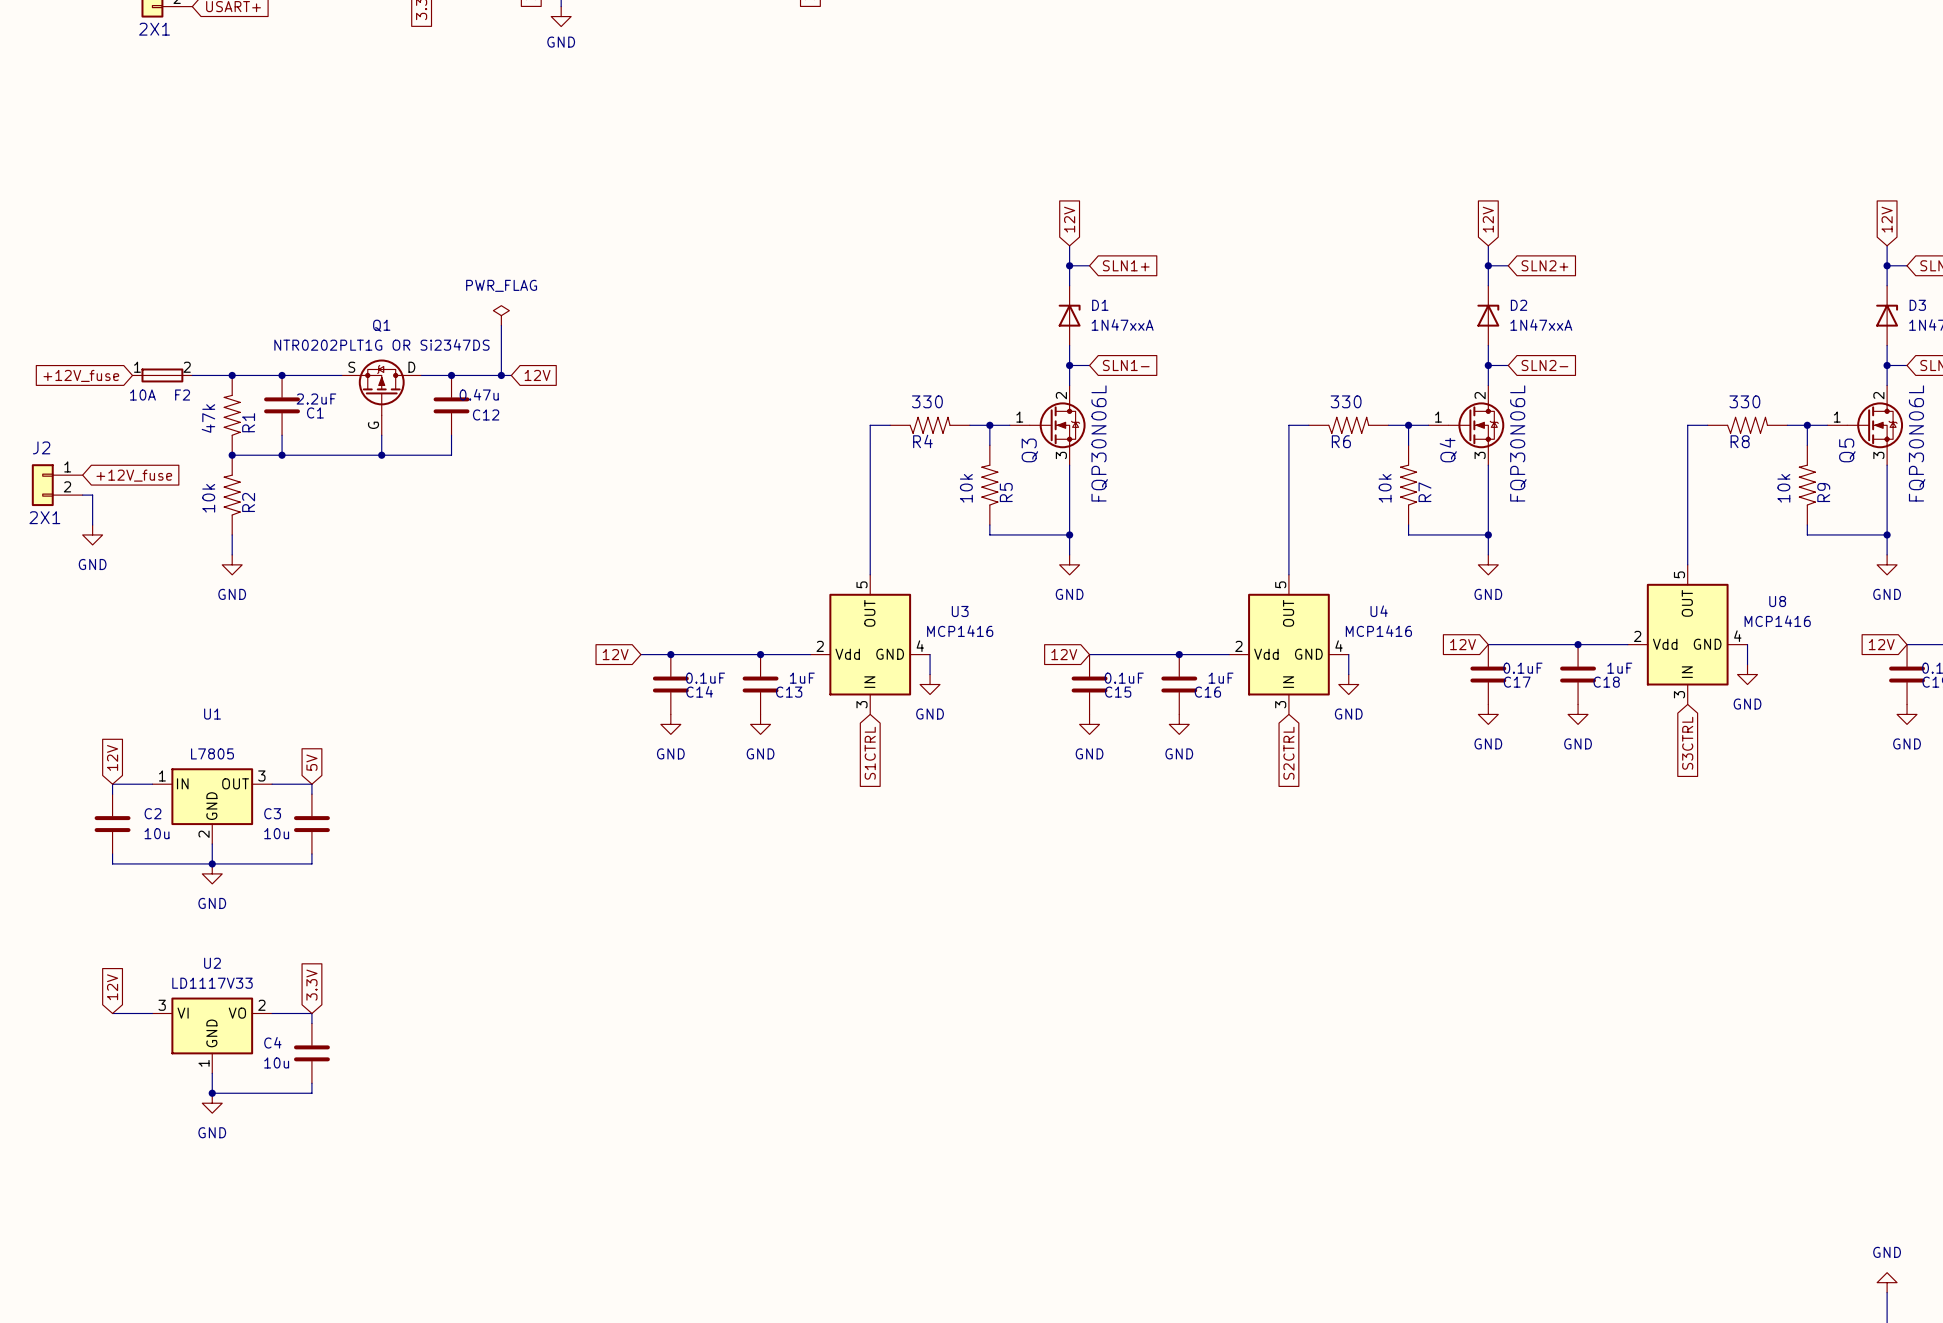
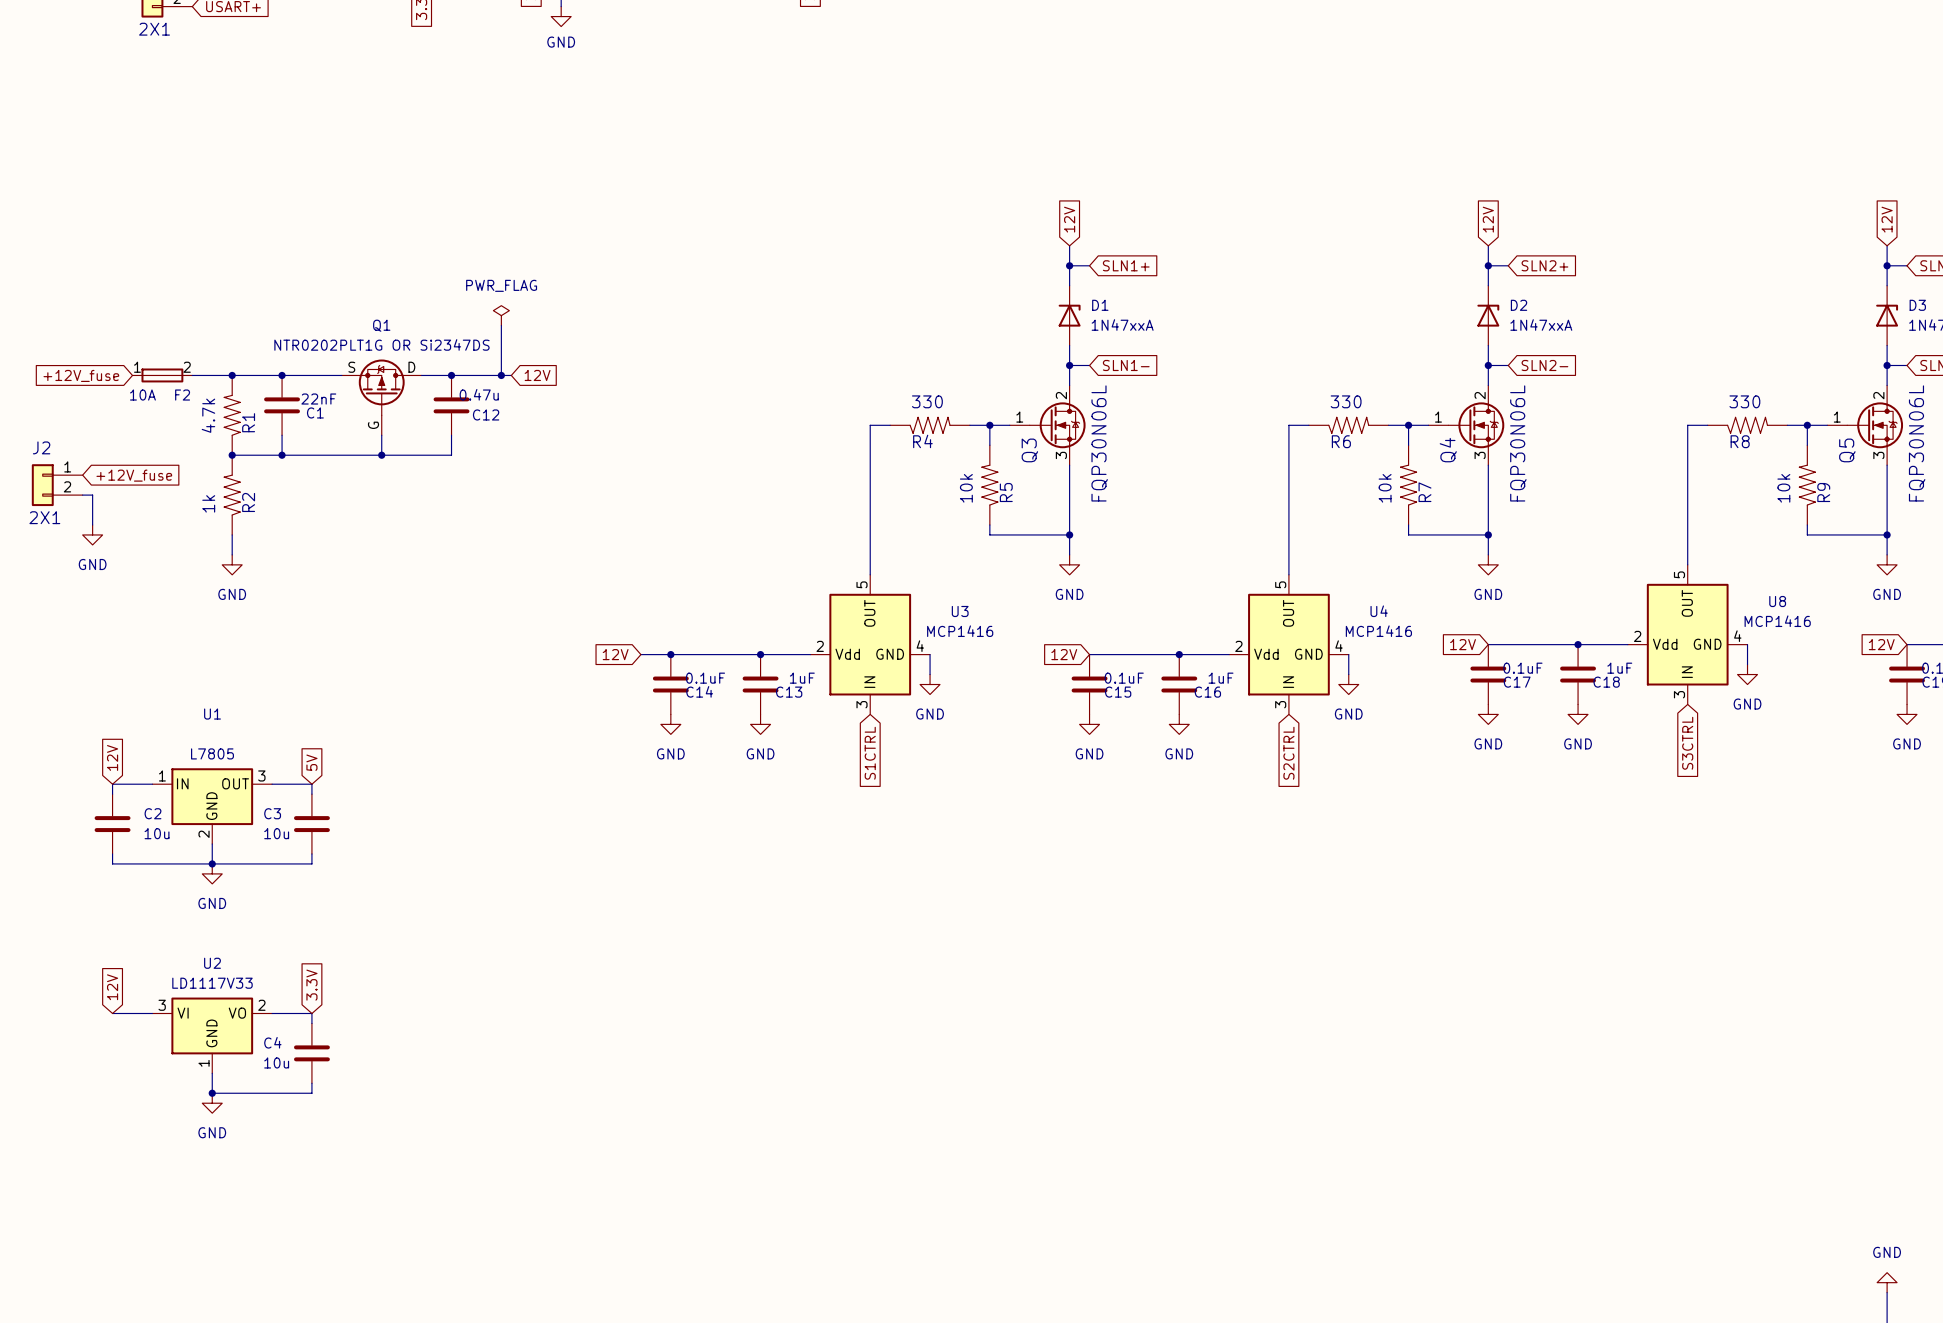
C1 value: 2.2uF (316, 399) -> 22nF (318, 399)
R1 value: 47k (208, 418) -> 4.7k (208, 415)
R2 value: 10k (208, 498) -> 1k (208, 503)

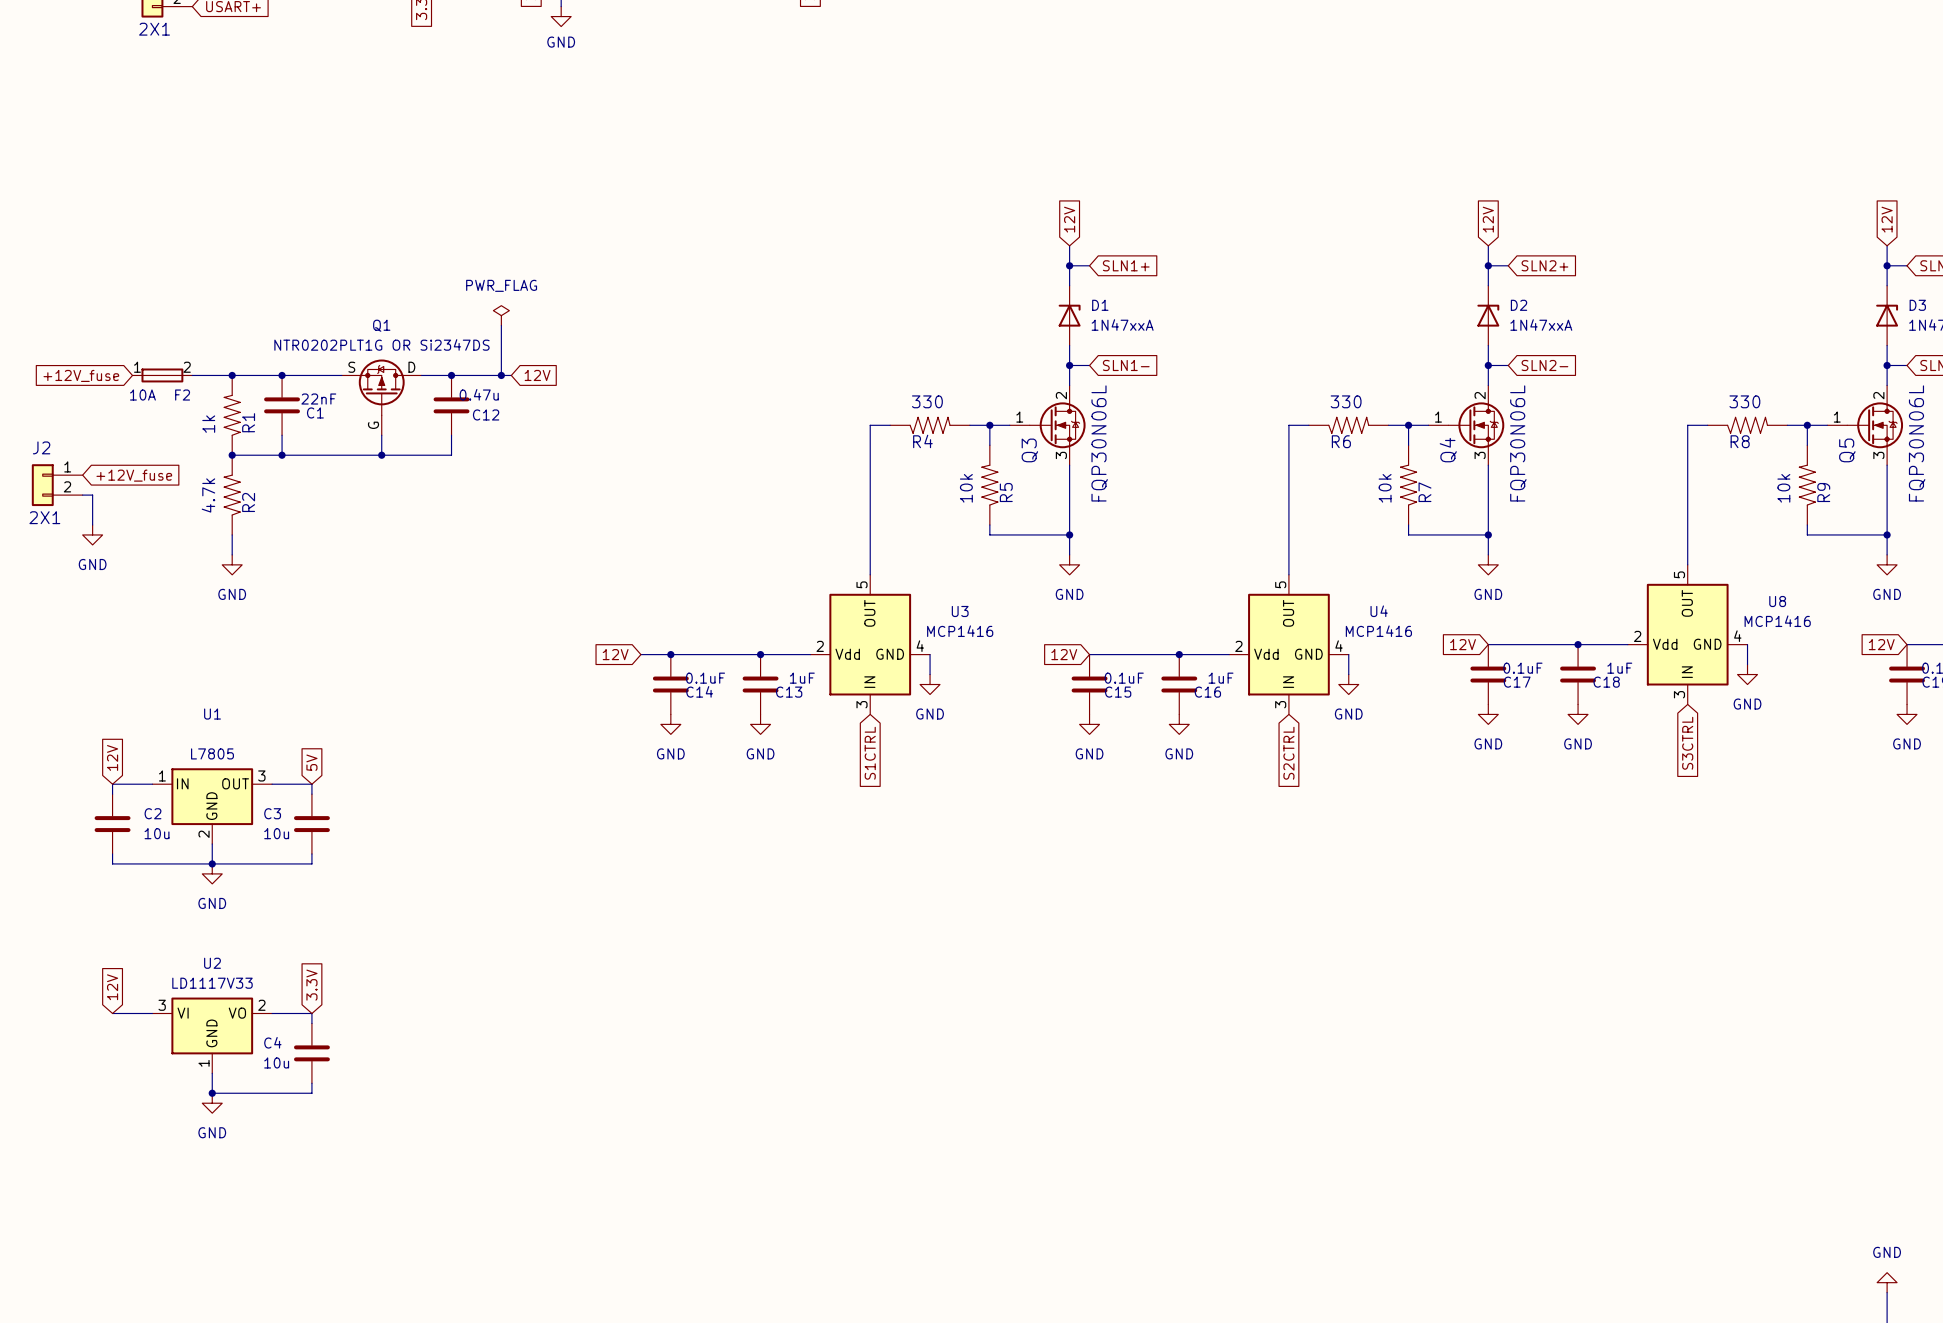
R1 value: 4.7k (208, 415) -> 1k (208, 424)
R2 value: 1k (208, 503) -> 4.7k (208, 495)

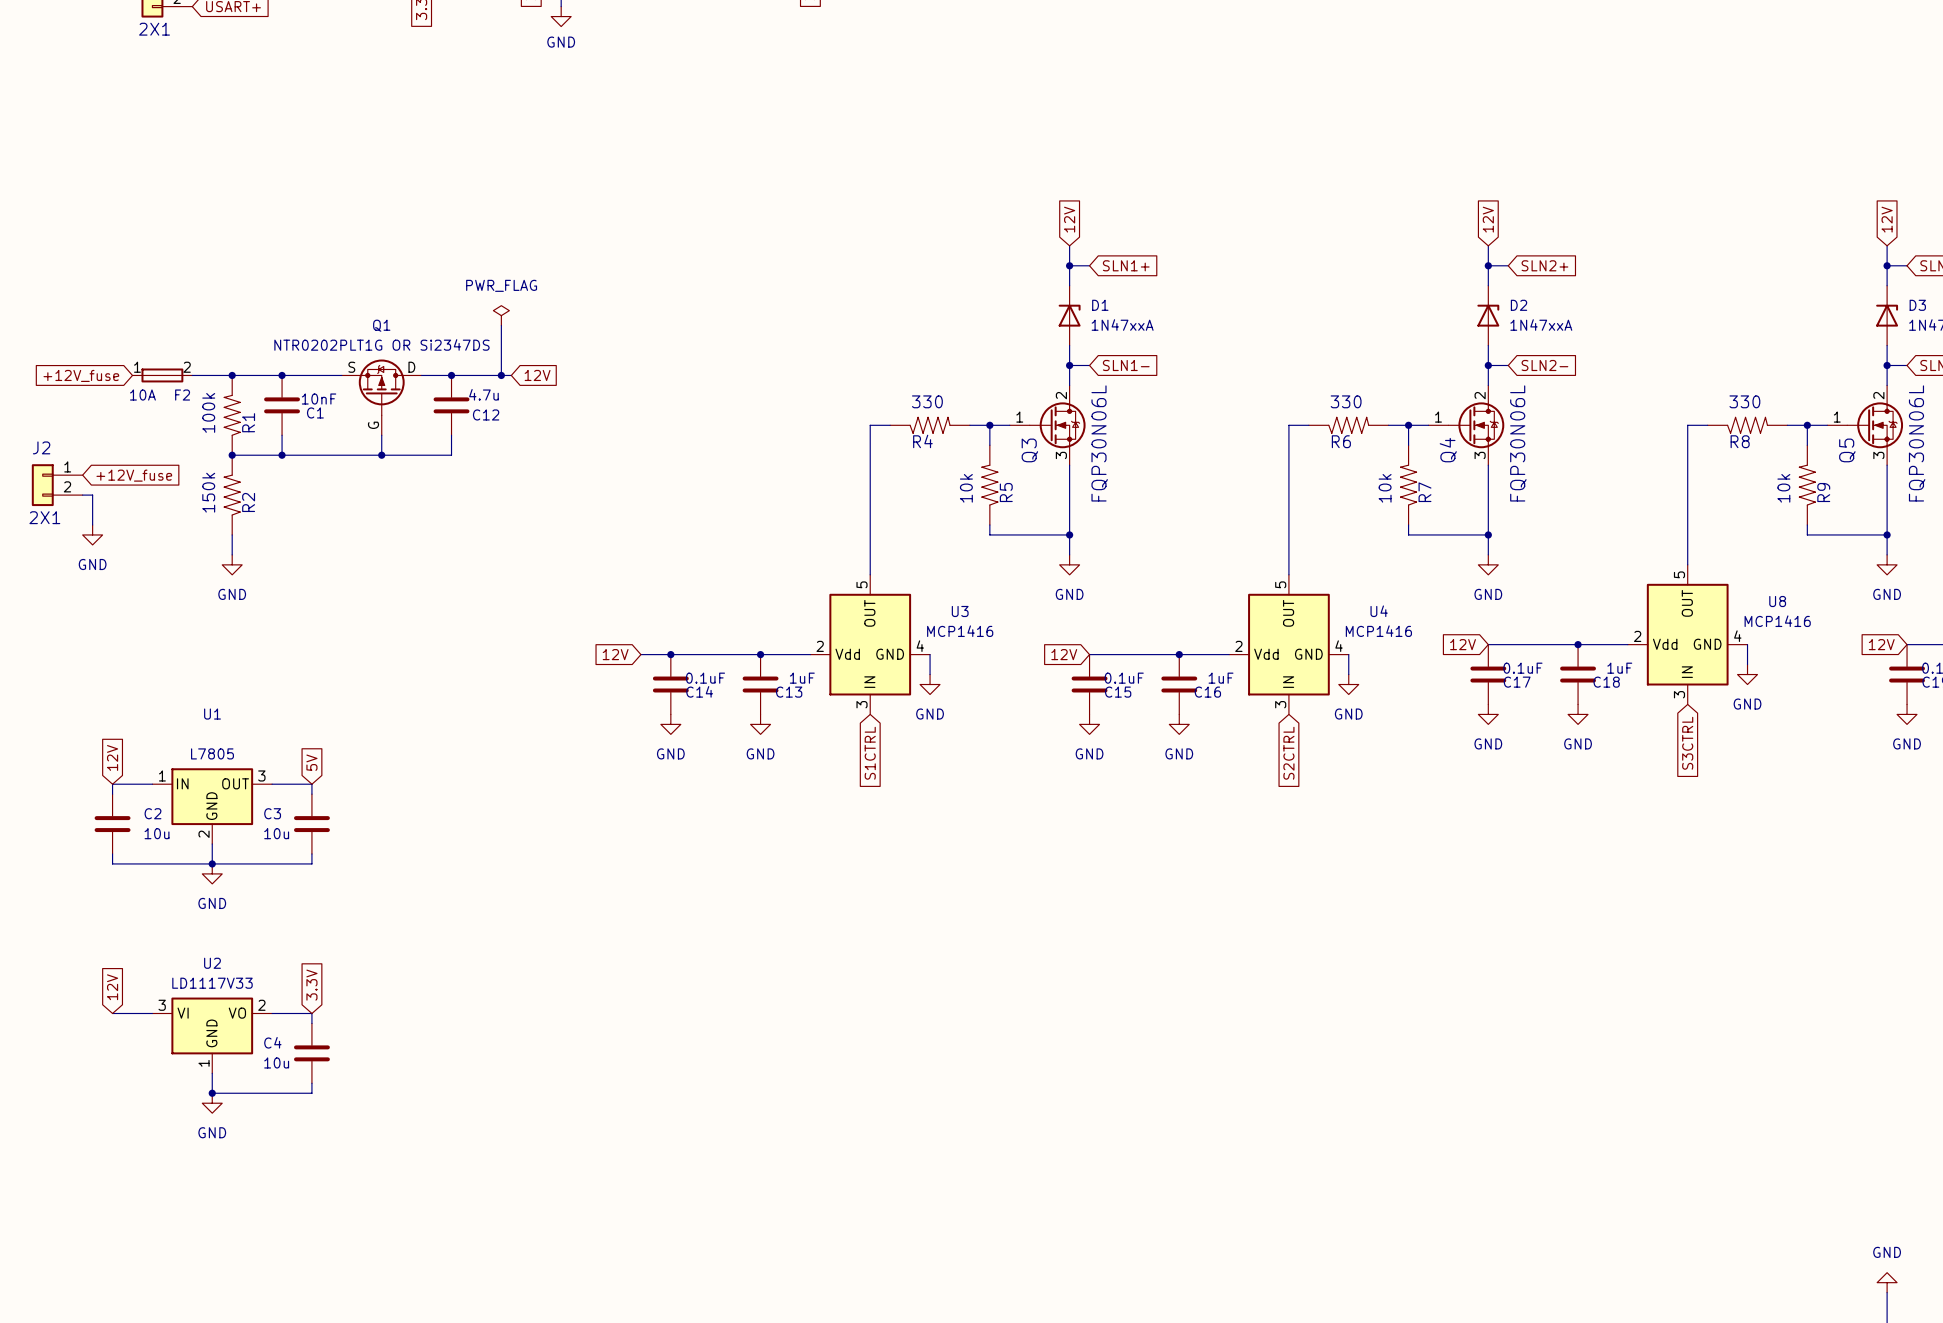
C12 value: 0.47u (479, 394) -> 4.7u (483, 394)
C1 value: 22nF (318, 399) -> 10nF (319, 399)
R1 value: 1k (208, 424) -> 100k (208, 412)
R2 value: 4.7k (208, 495) -> 150k (208, 492)

